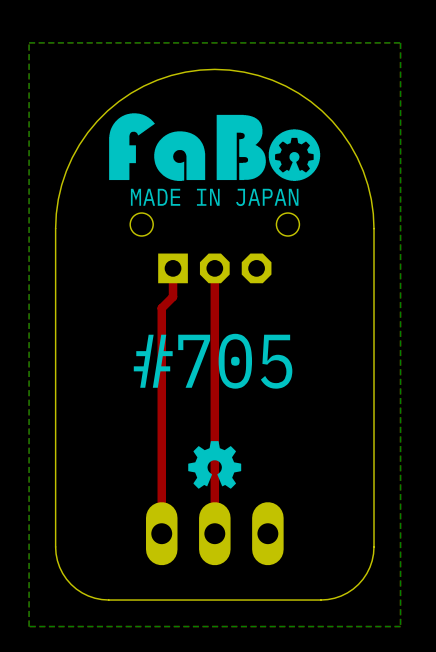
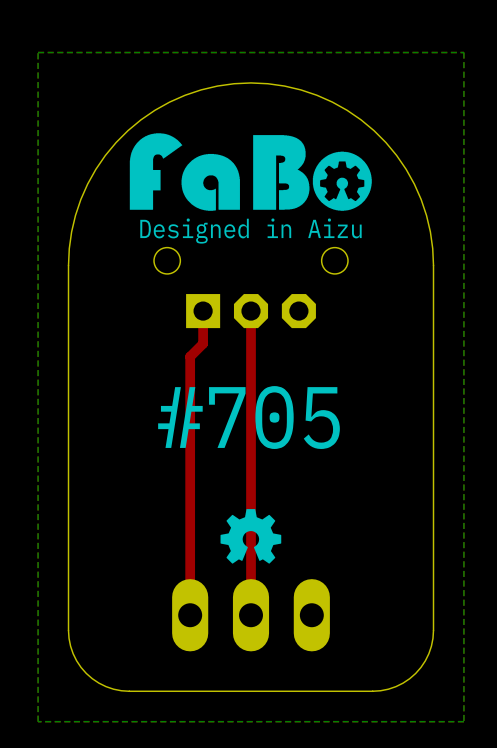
text: MADE IN JAPAN (214, 197) -> Designed in Aizu (250, 231)

